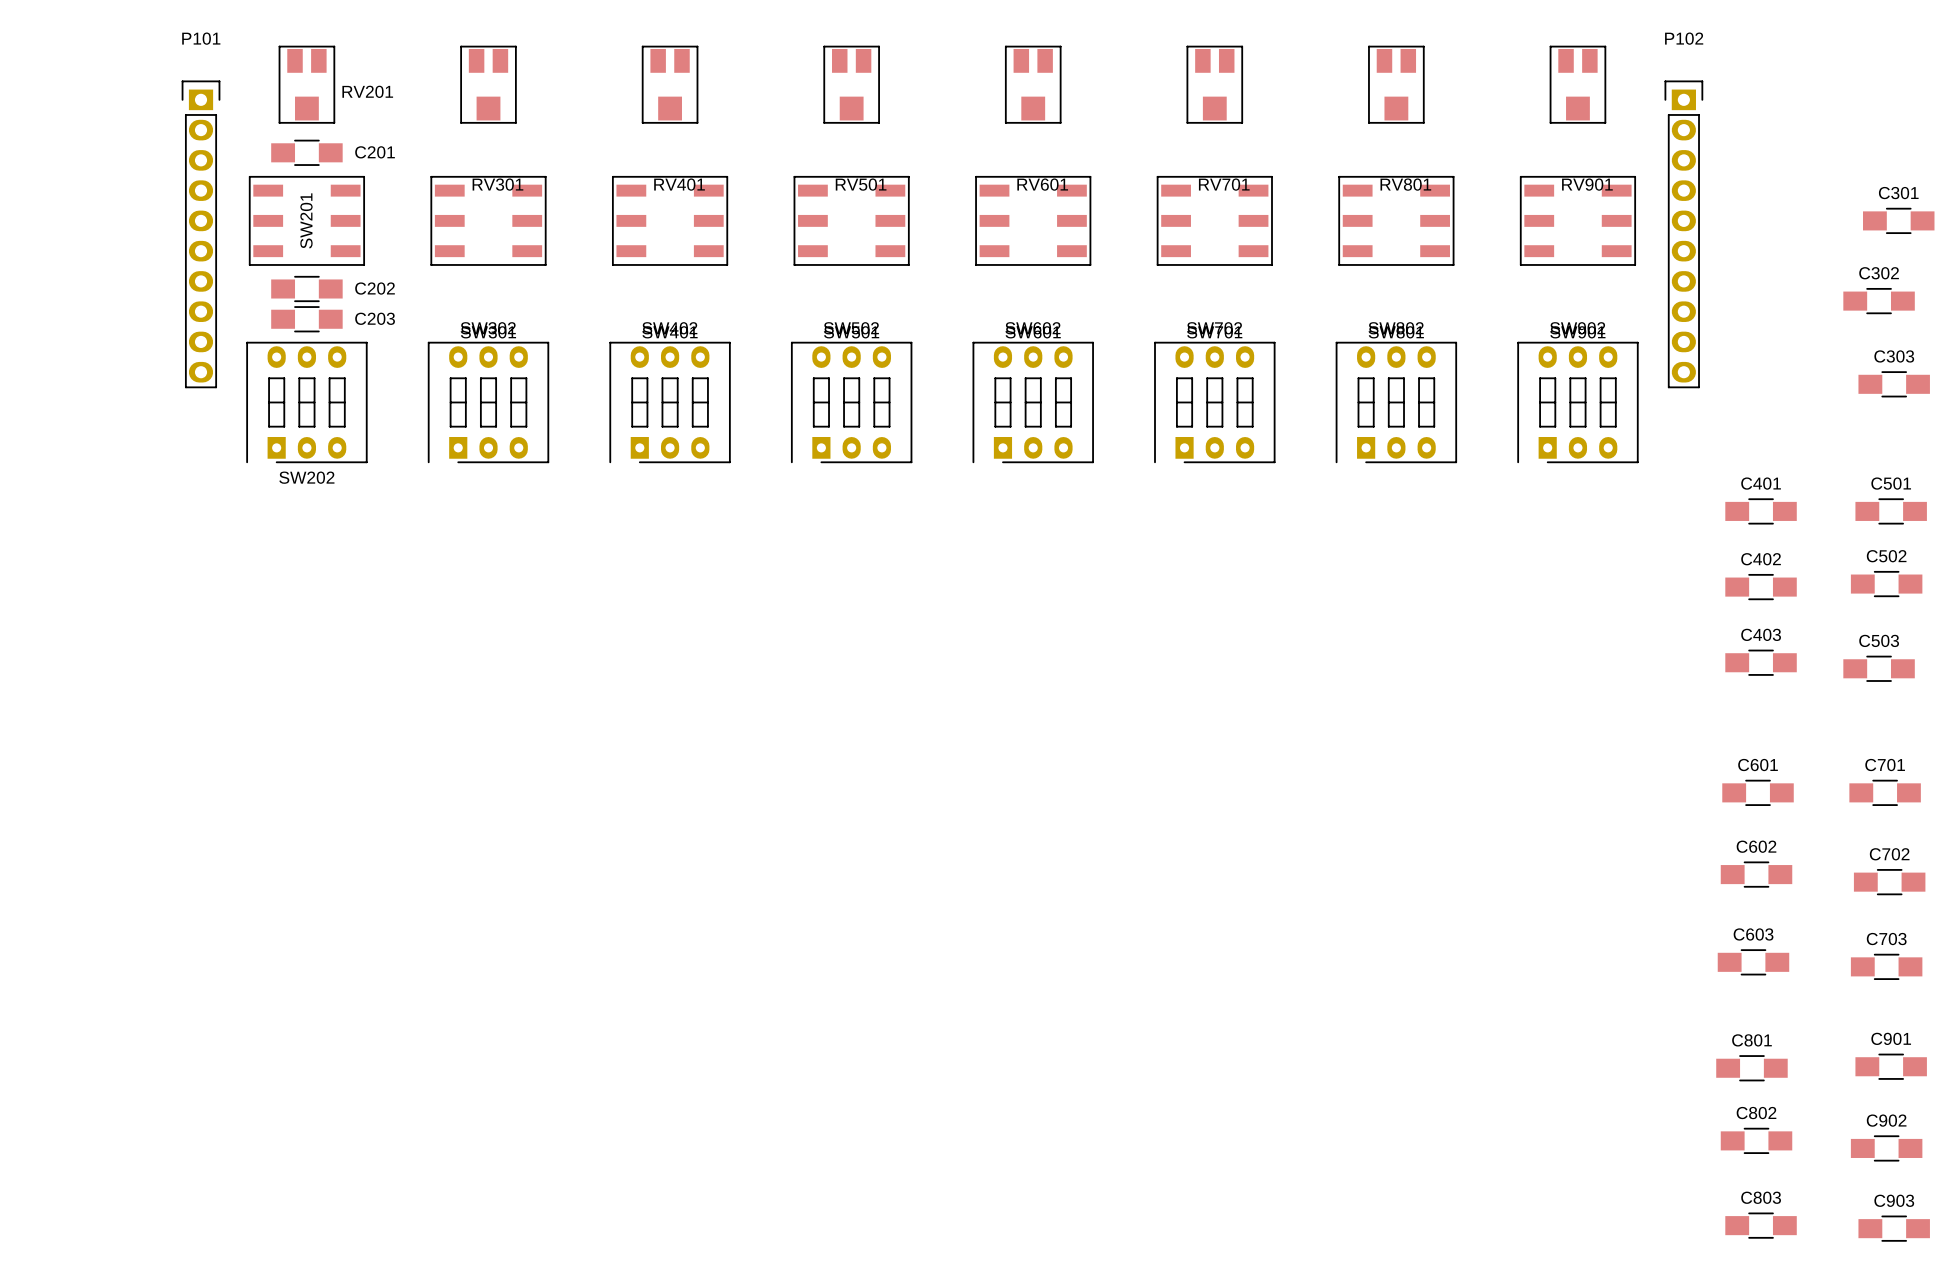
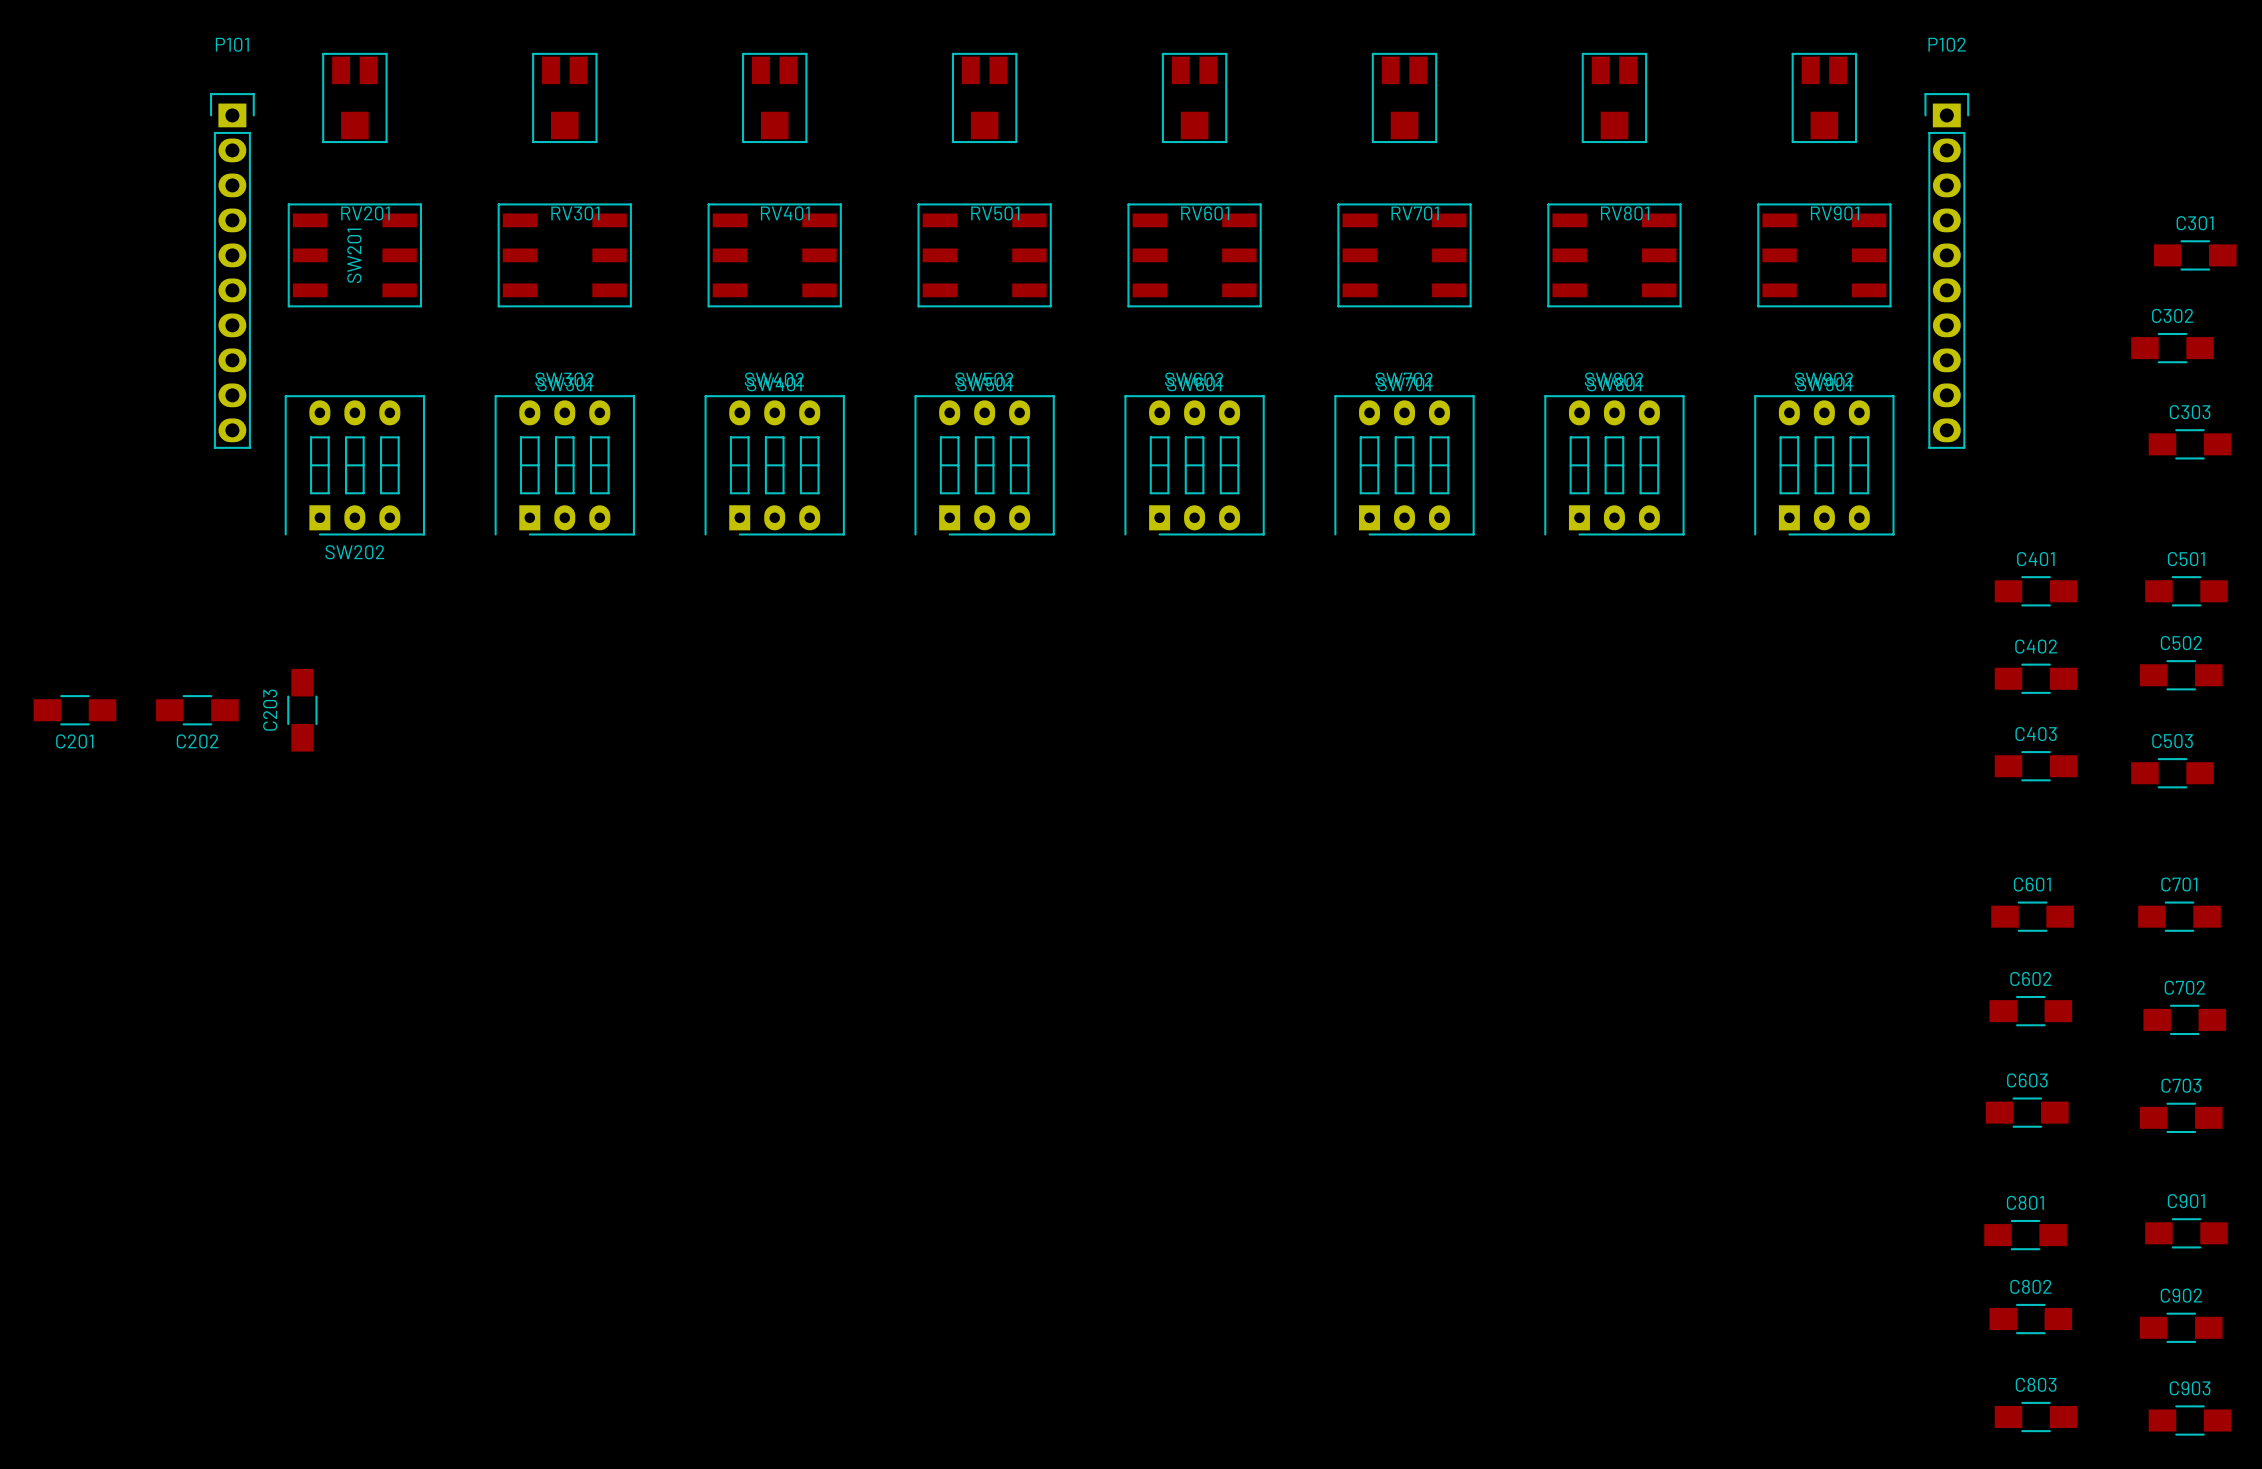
RV201 name position: RV201 (367, 91) -> RV201 (365, 213)
C201 position: (306, 152) -> (74, 710)
C201 name position: C201 (375, 152) -> C201 (74, 741)
C202 position: (306, 288) -> (197, 710)
C202 name position: C202 (375, 288) -> C202 (197, 741)
C203 name position: C203 (375, 318) -> C203 (270, 710)
C203 rotation: 0° (306, 319) -> 90° clockwise (302, 710)
C203 position: (306, 319) -> (302, 710)

